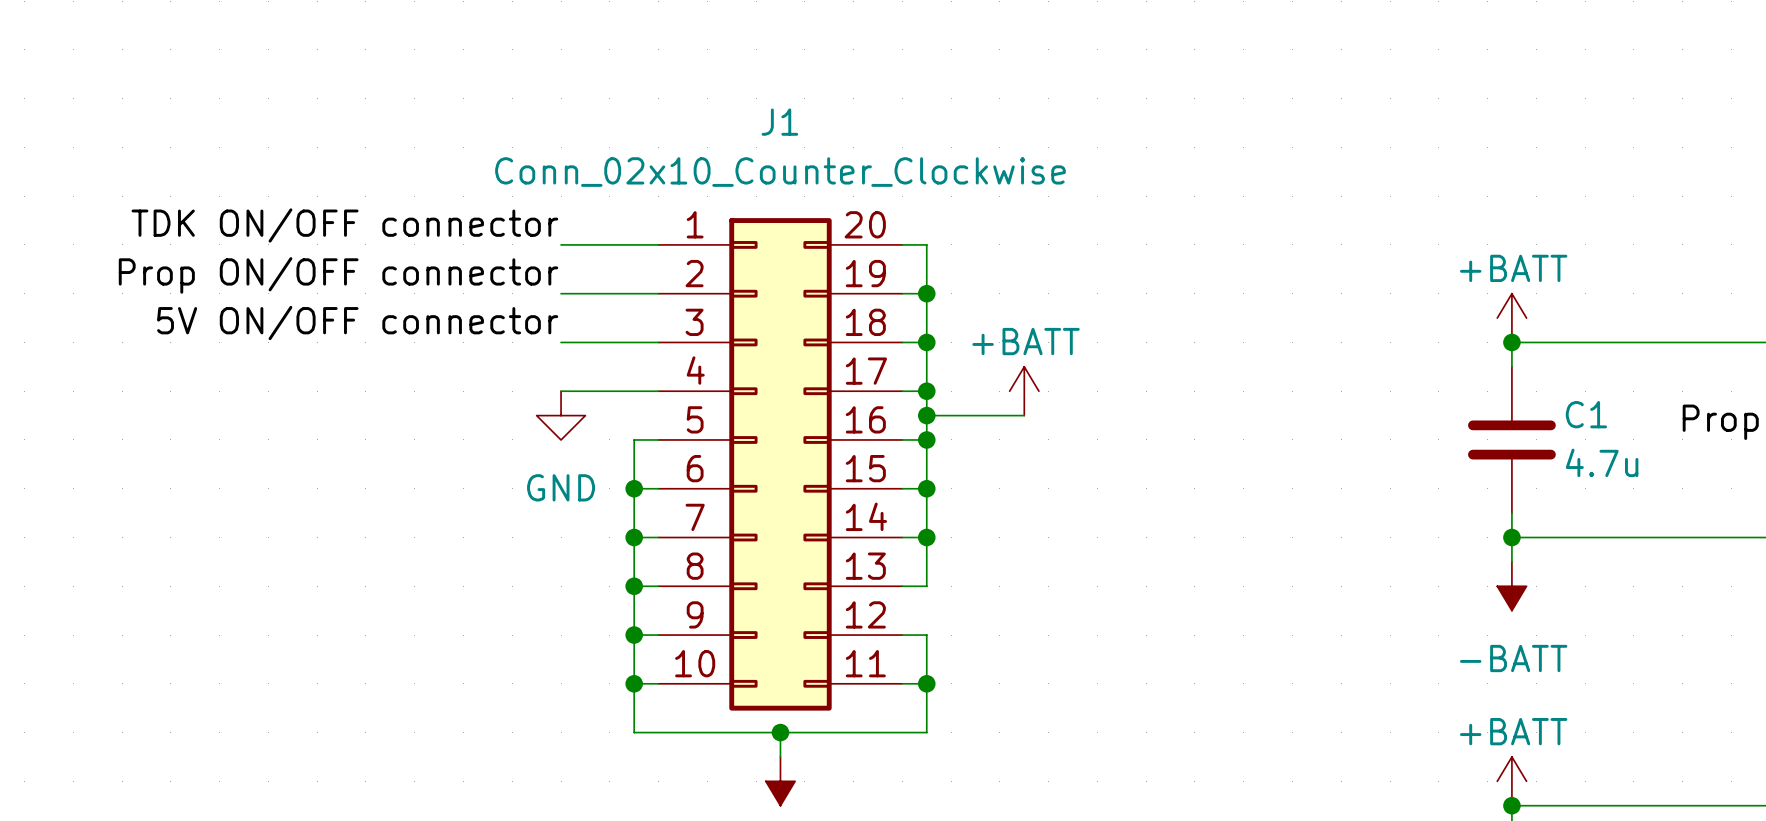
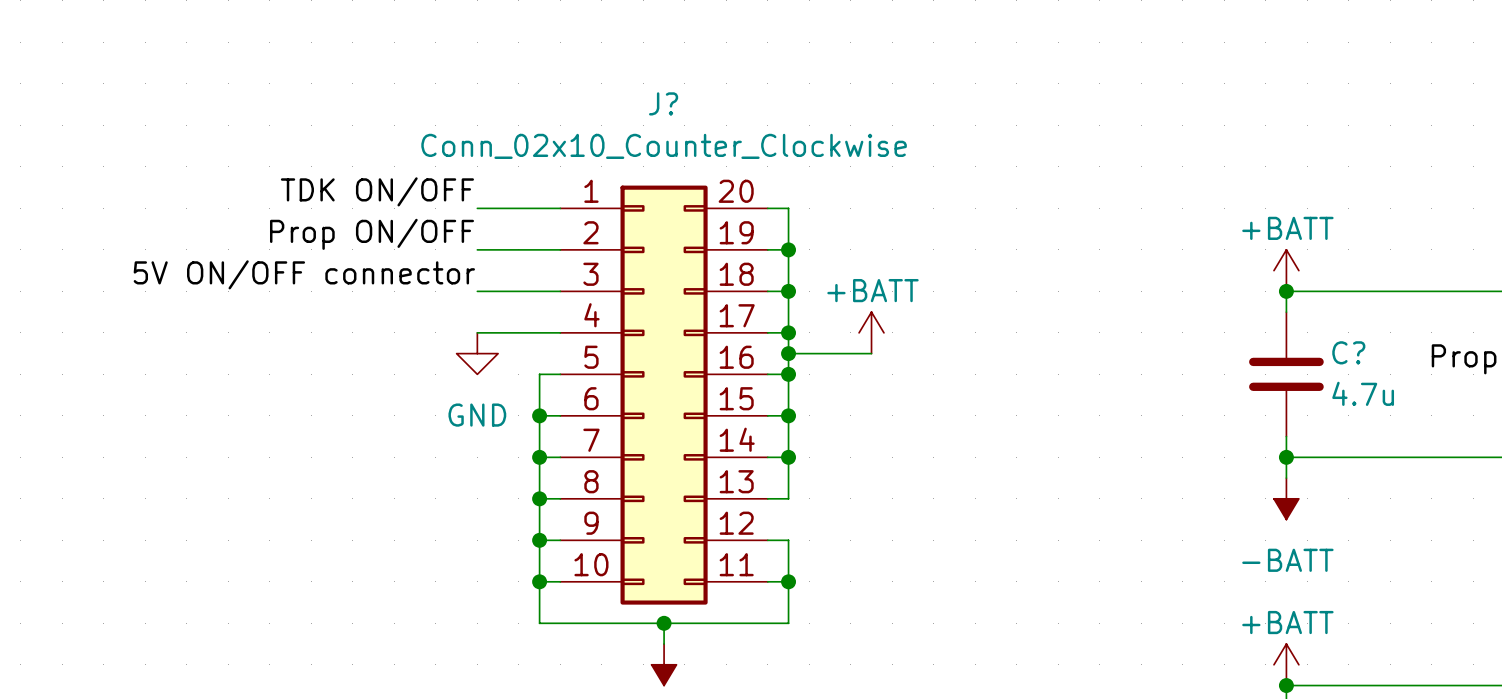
J1 name: J1 (779, 122) -> J? (663, 103)
label: TDK ON/OFF connector (344, 225) -> TDK ON/OFF (377, 191)
label: Prop ON/OFF connector (338, 275) -> Prop ON/OFF (371, 234)
C1 name: C1 (1586, 414) -> C? (1348, 352)

